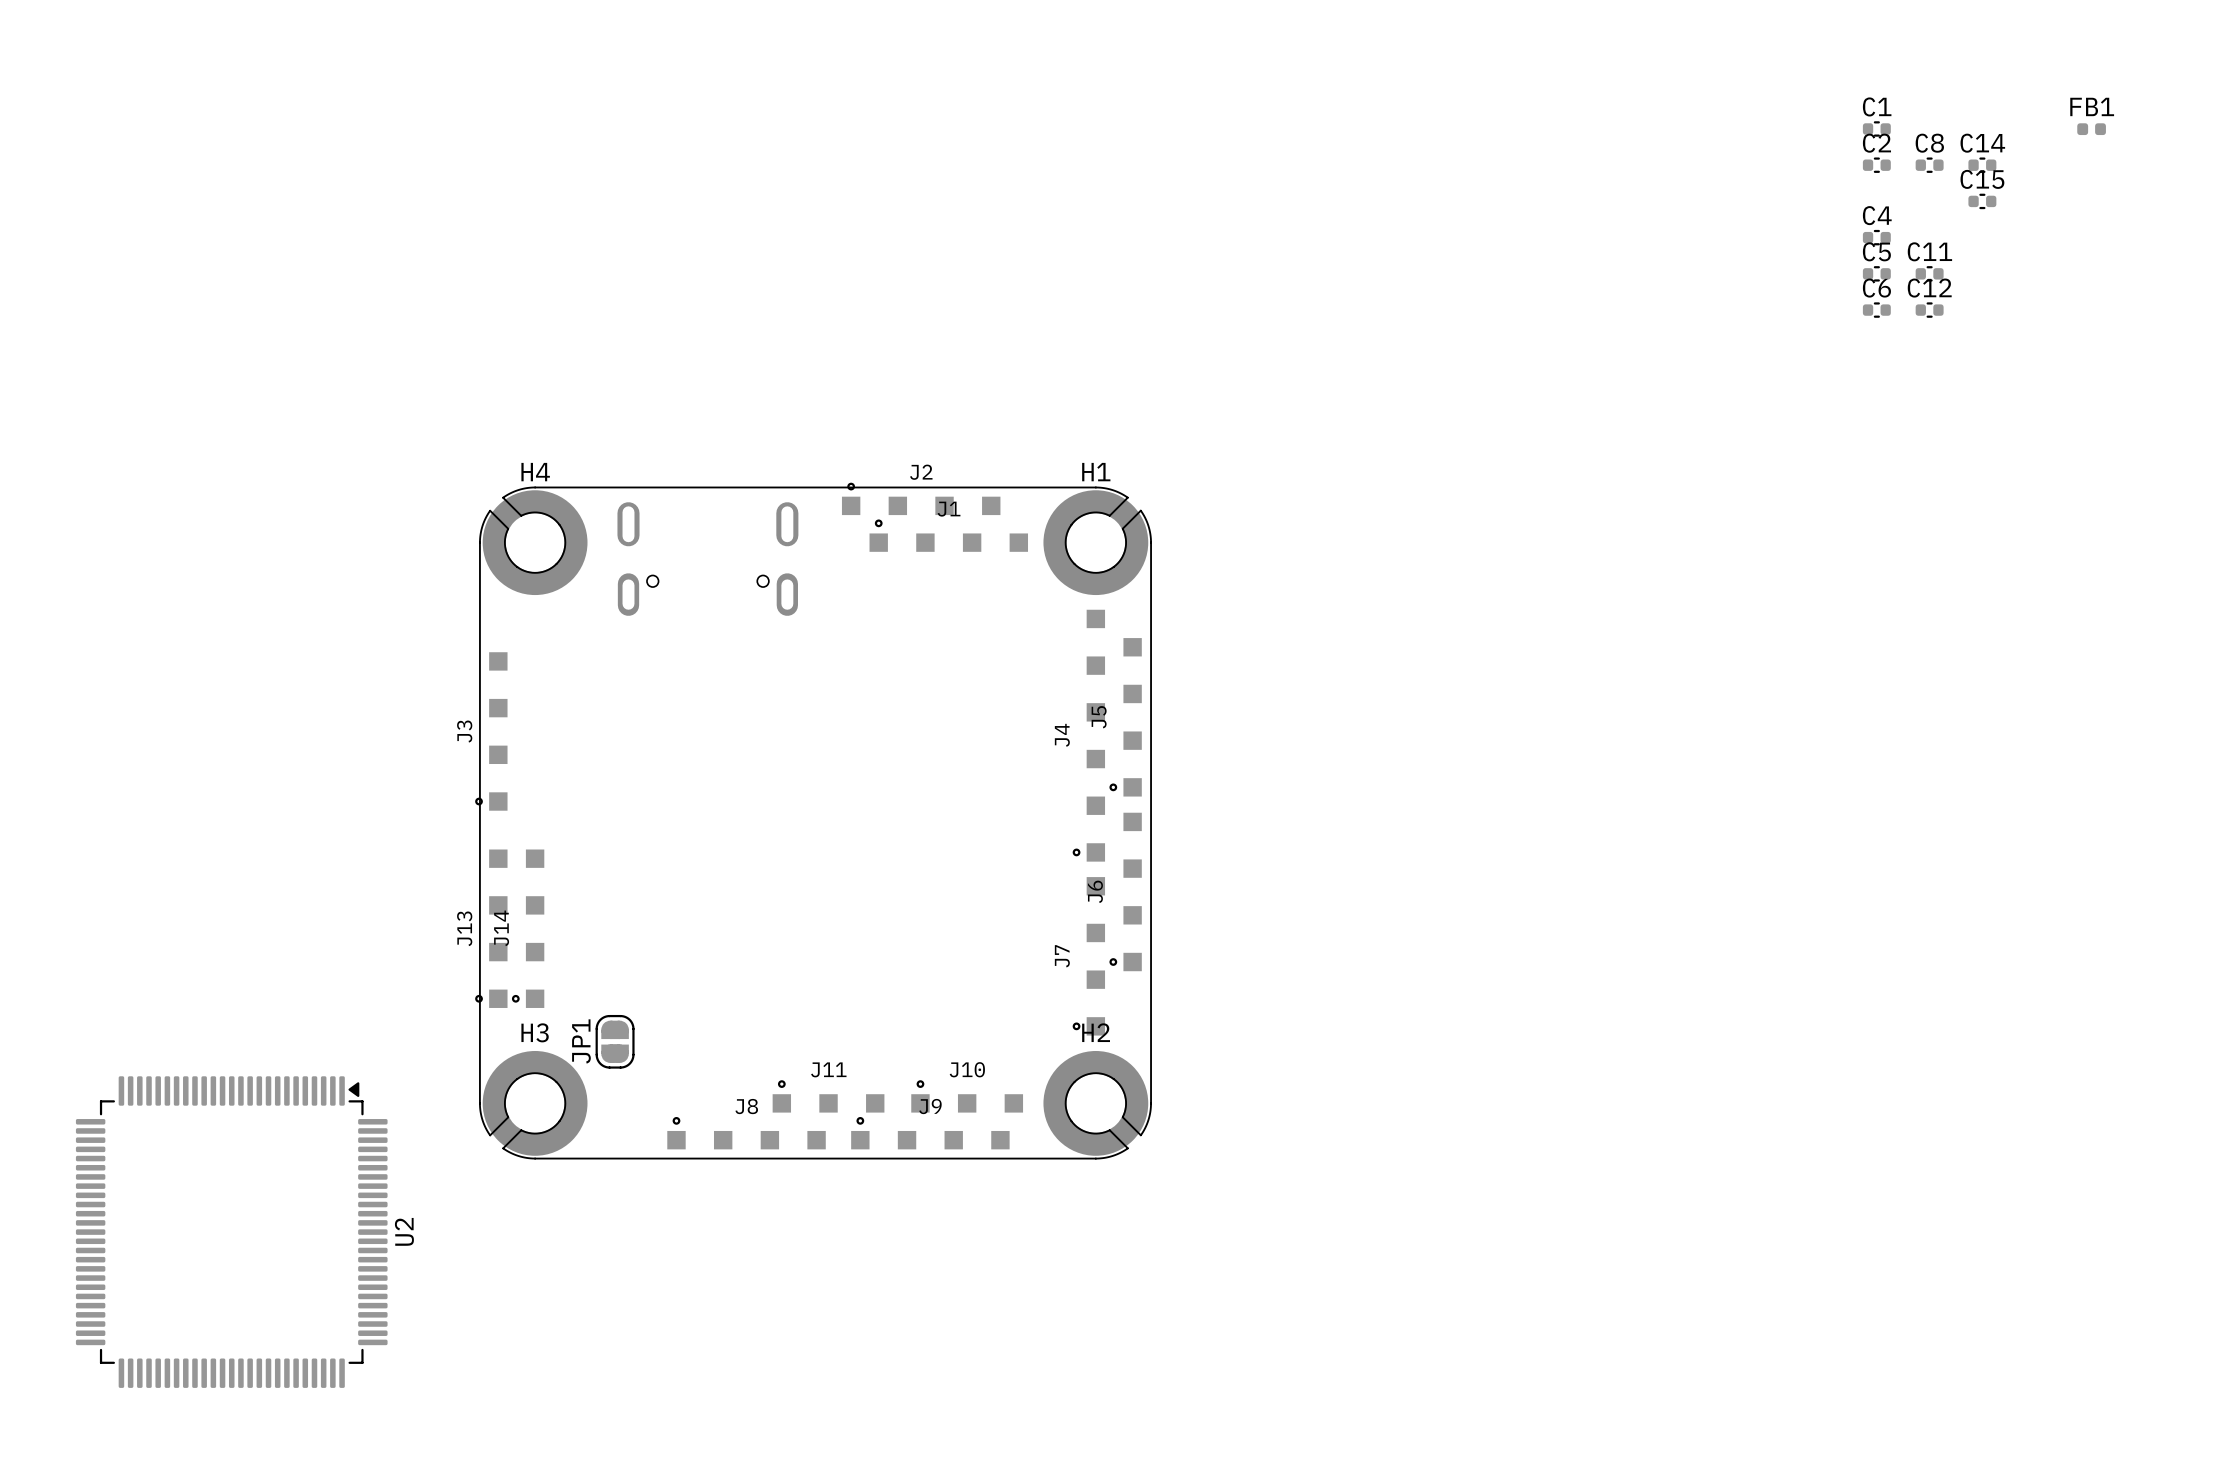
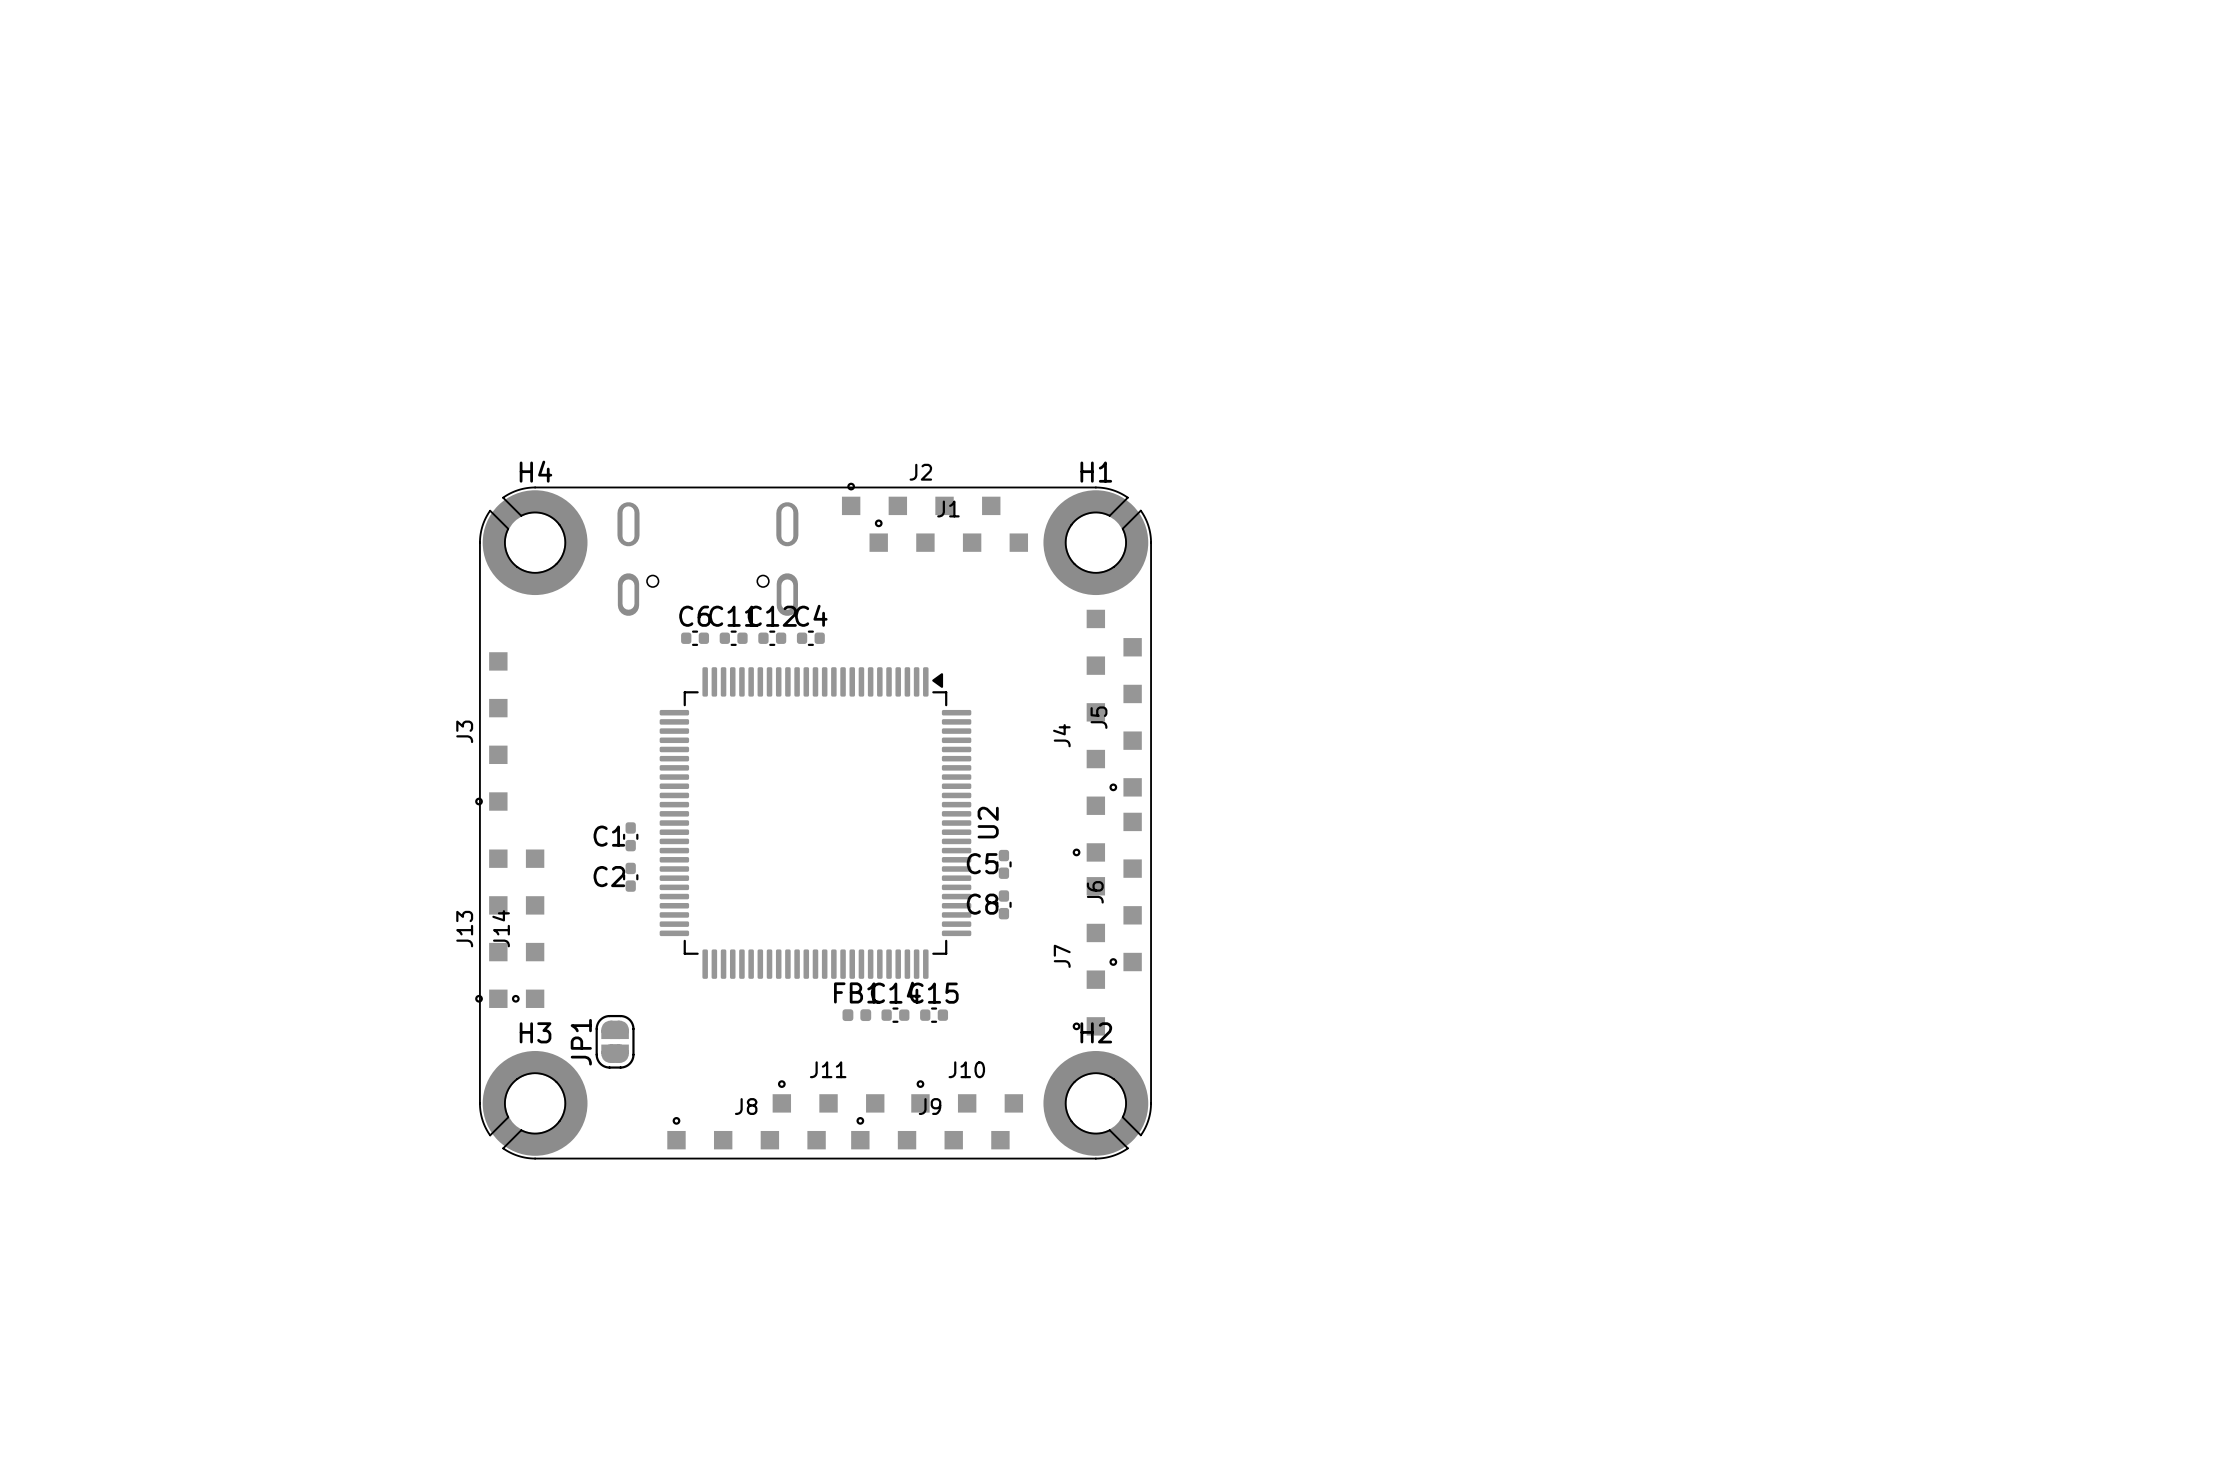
C1 footprint: [1862, 121, 1891, 137] -> [622, 822, 639, 852]
FB1 position: (2091, 129) -> (856, 1015)
C2 footprint: [1862, 157, 1891, 173] -> [622, 862, 639, 892]
C8 footprint: [1915, 157, 1944, 173] -> [996, 890, 1012, 920]
C14 position: (1982, 165) -> (895, 1015)
C15 position: (1982, 201) -> (934, 1015)
C4 position: (1876, 237) -> (810, 638)
C5 footprint: [1862, 266, 1891, 282] -> [996, 849, 1012, 879]
C11 position: (1929, 273) -> (733, 638)
C6 position: (1876, 310) -> (695, 638)
C12 position: (1929, 310) -> (772, 638)
U2 position: (231, 1232) -> (815, 823)

